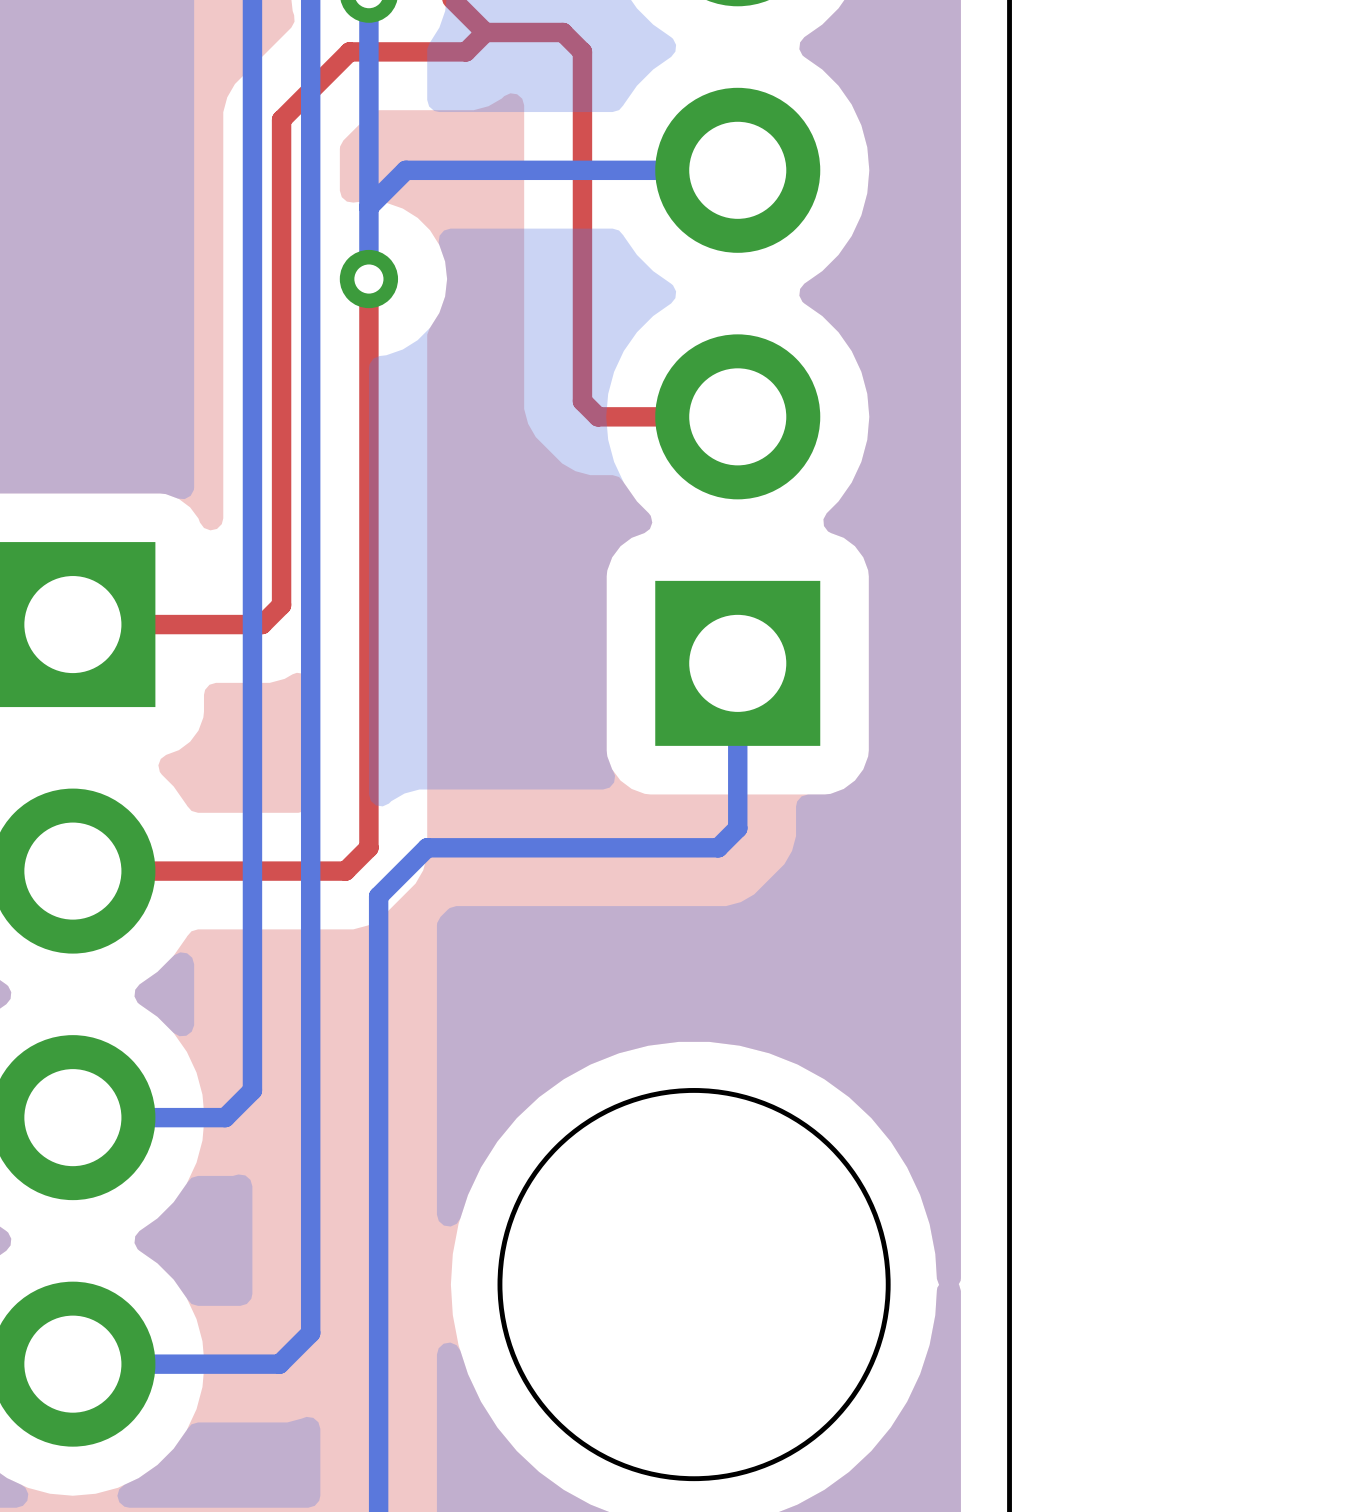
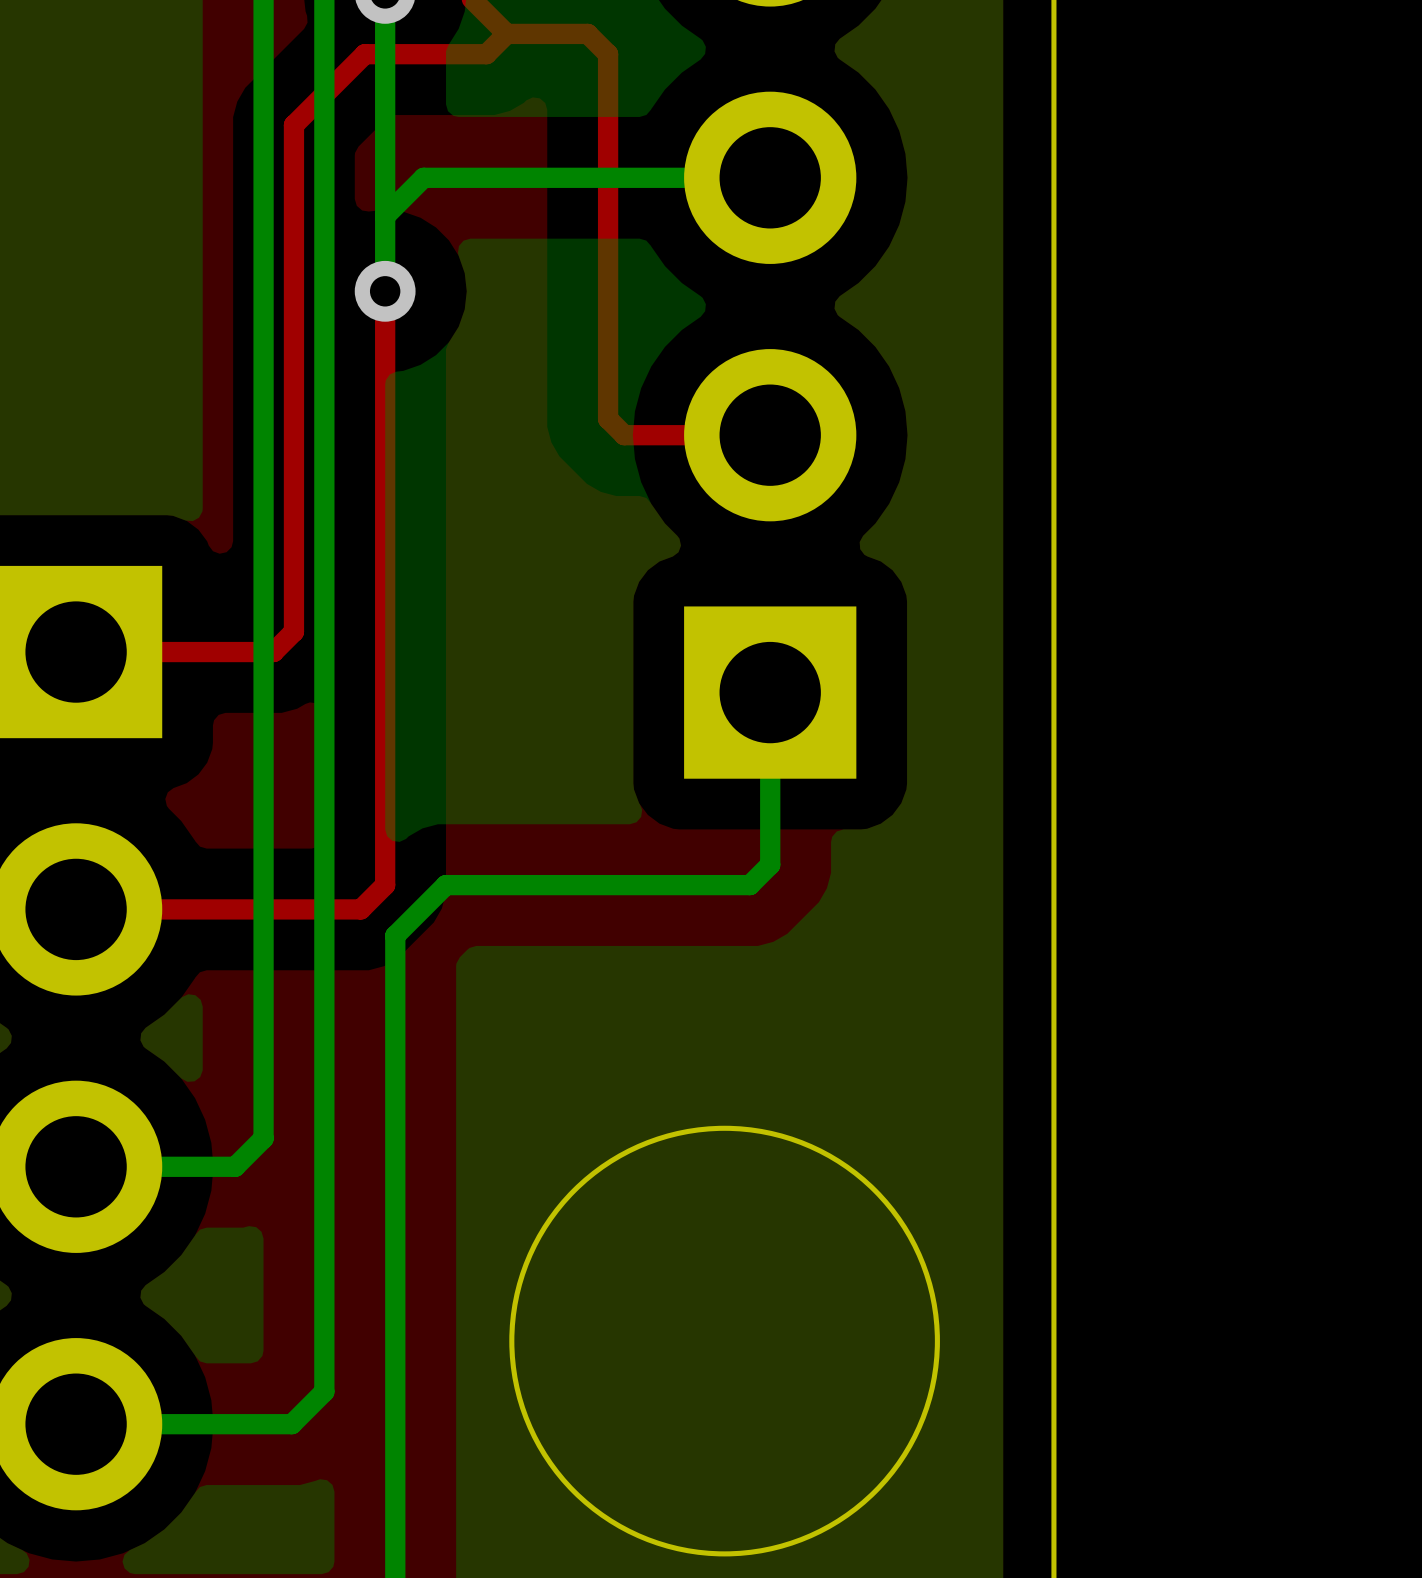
round board edge size: [497, 1088, 891, 1482] -> [509, 1125, 940, 1557]

